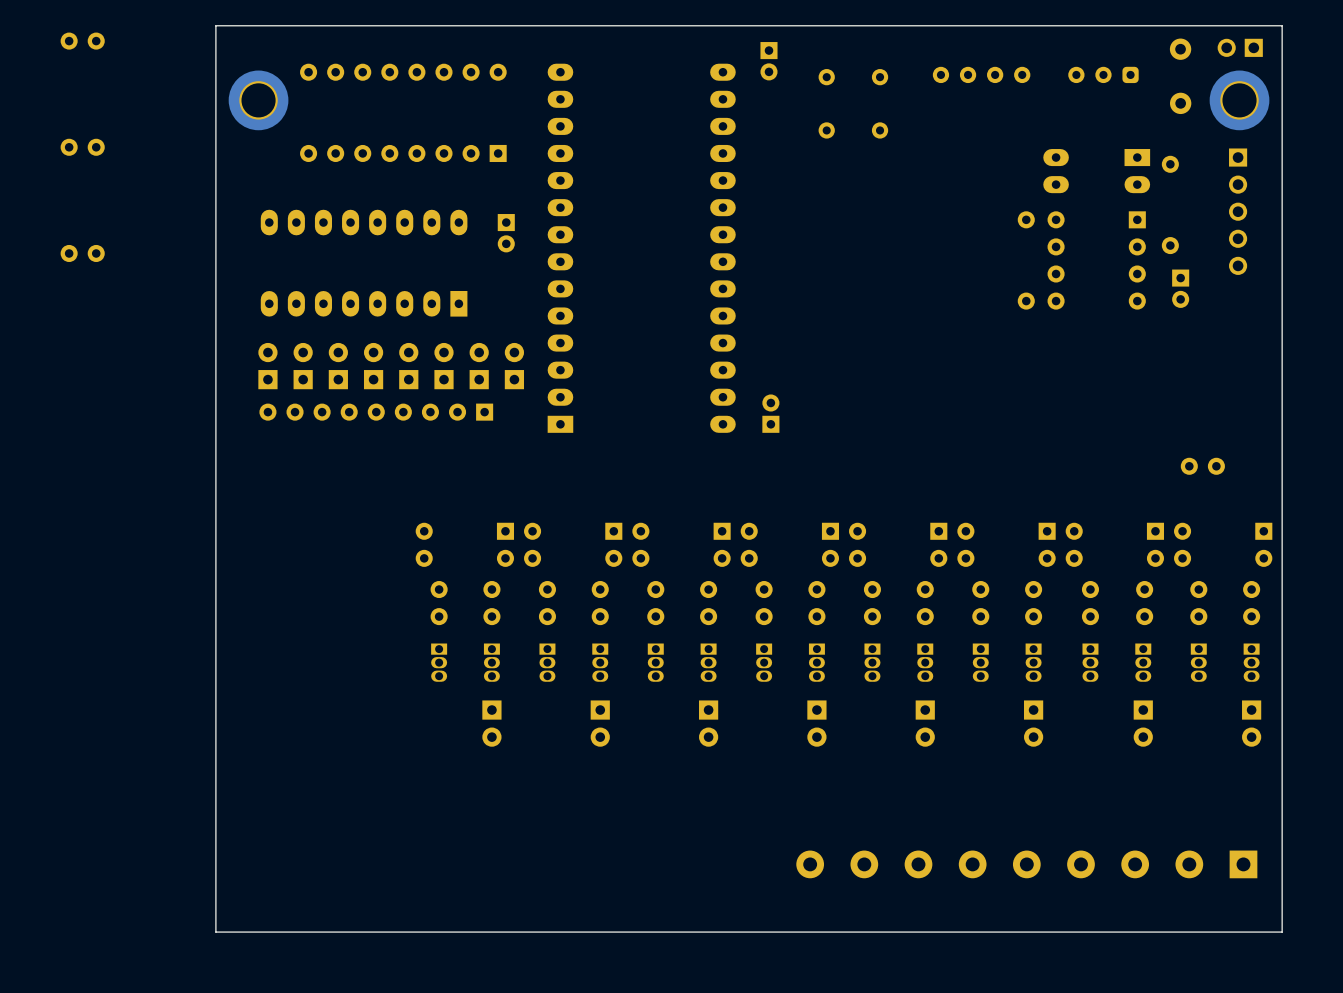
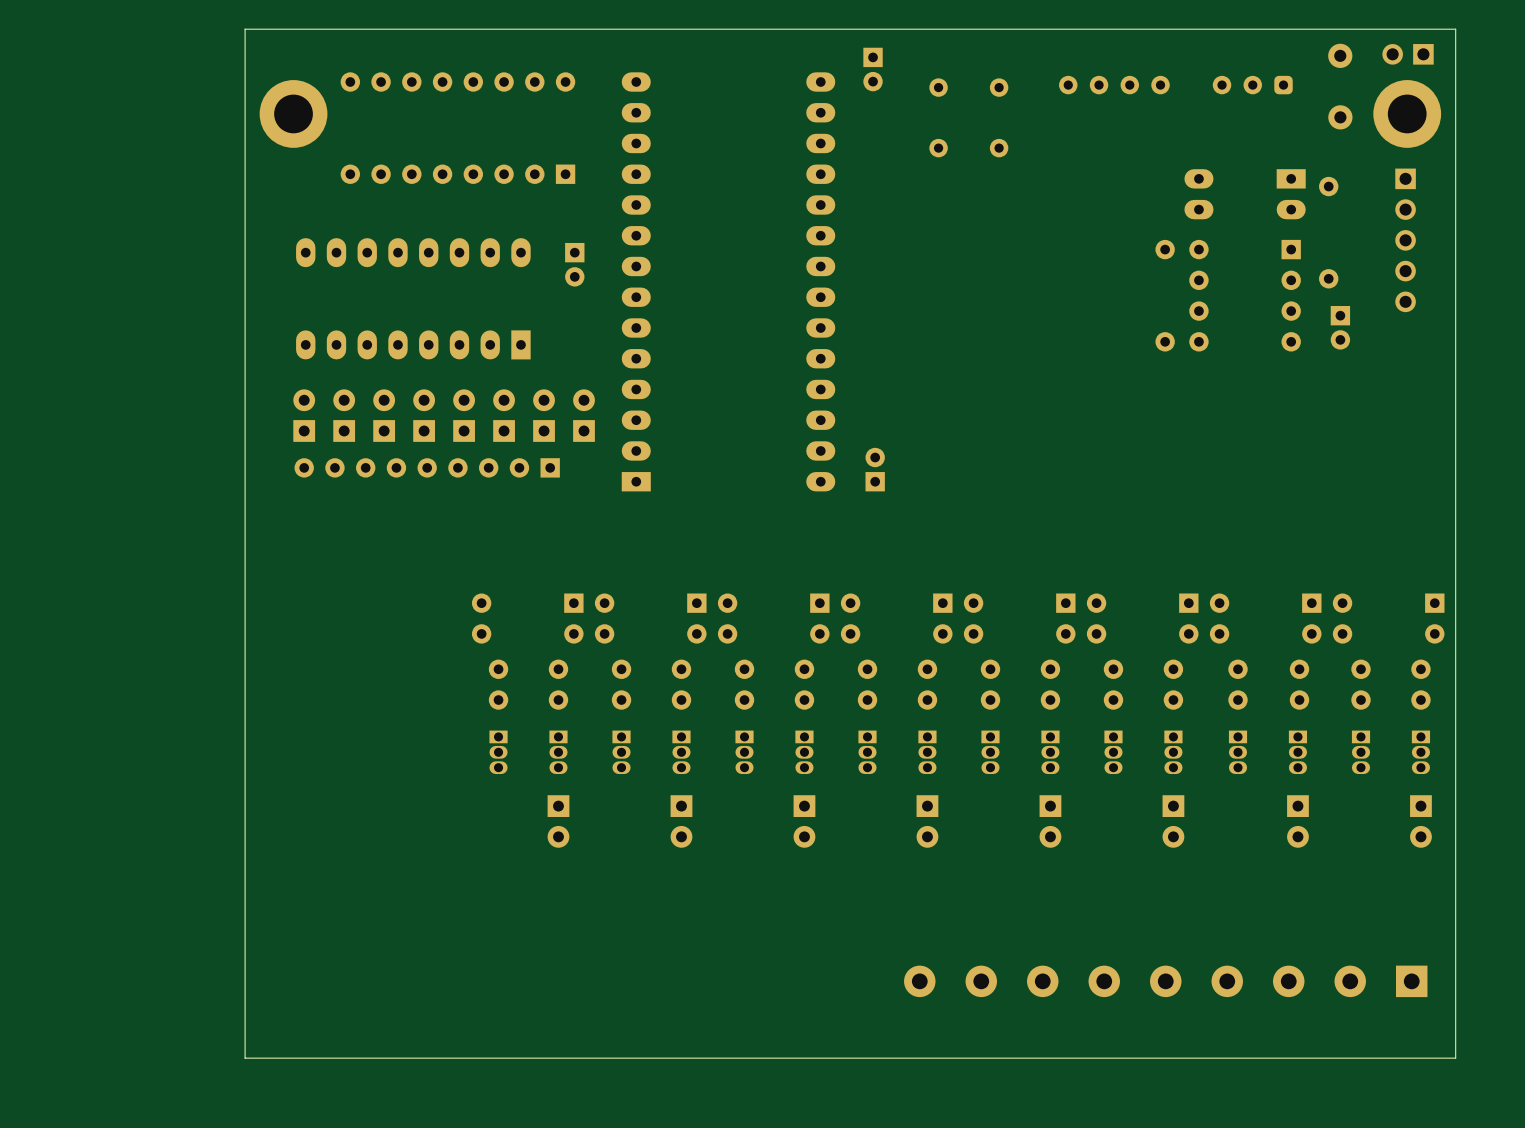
part: (82, 41) -> none
part: (82, 147) -> none
part: (82, 253) -> none
part: (1202, 466) -> none

